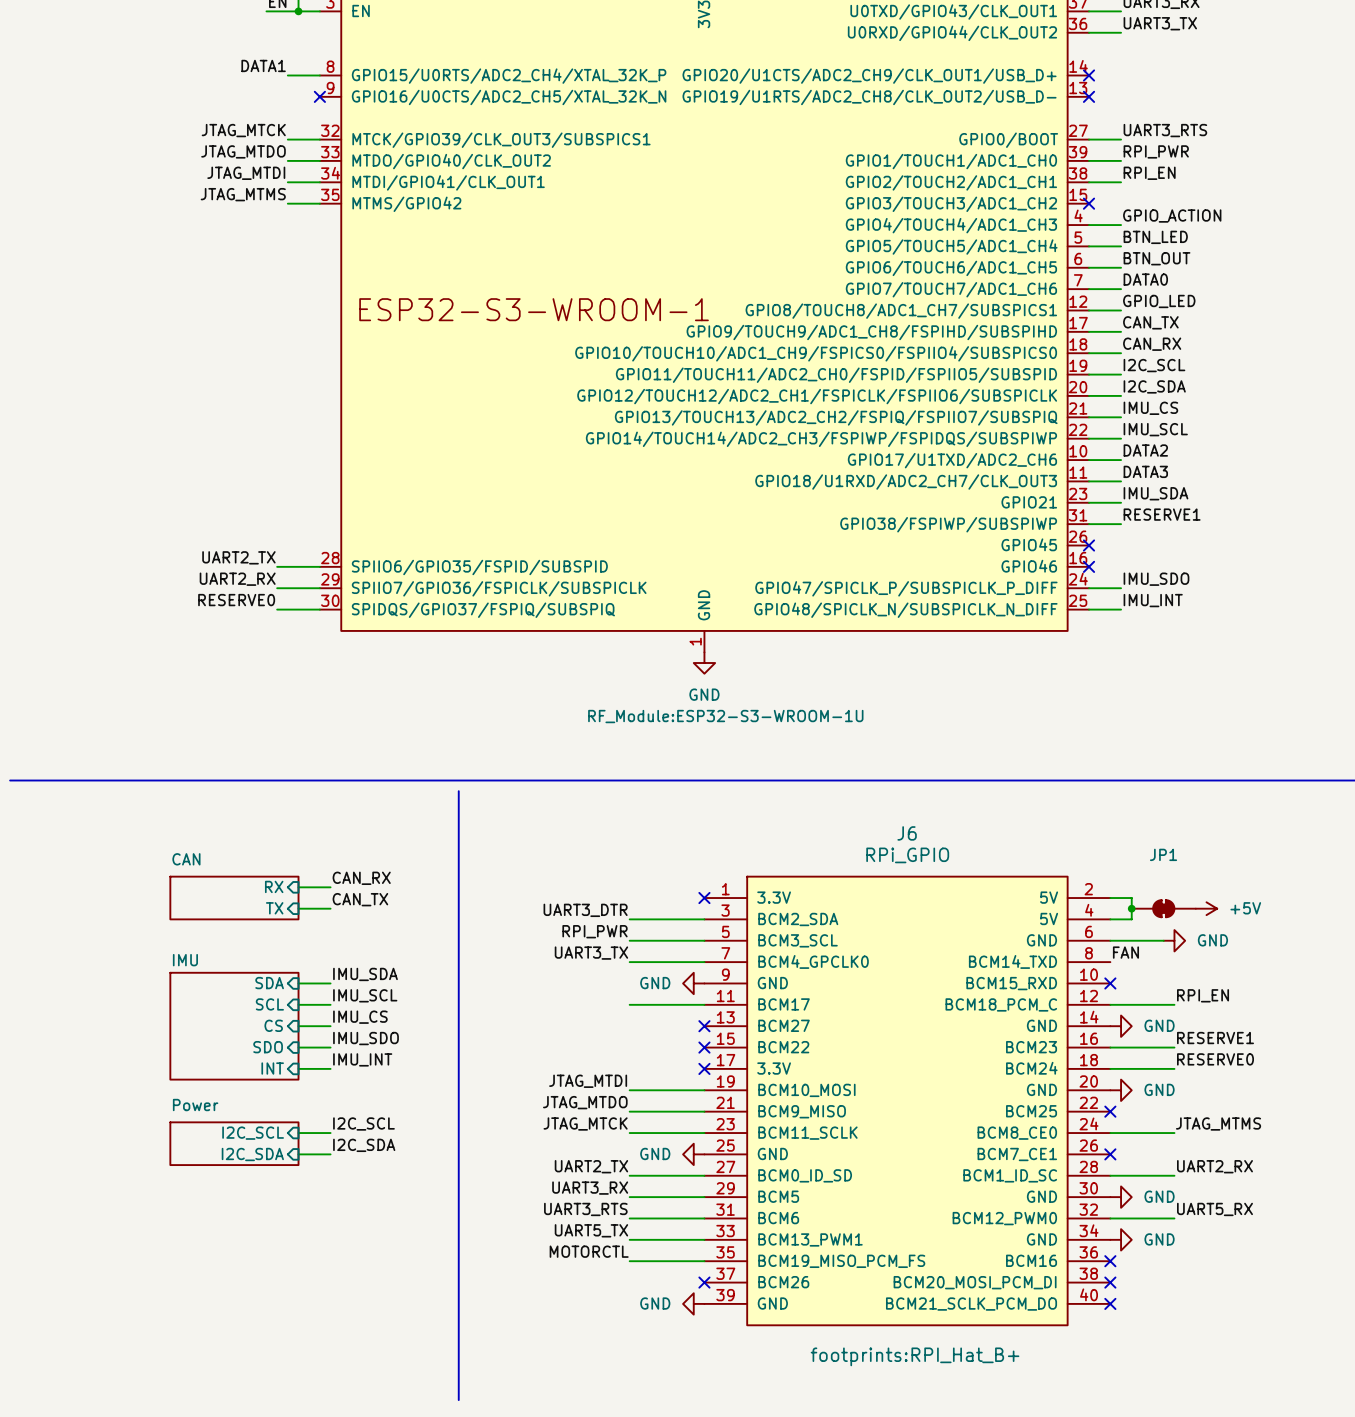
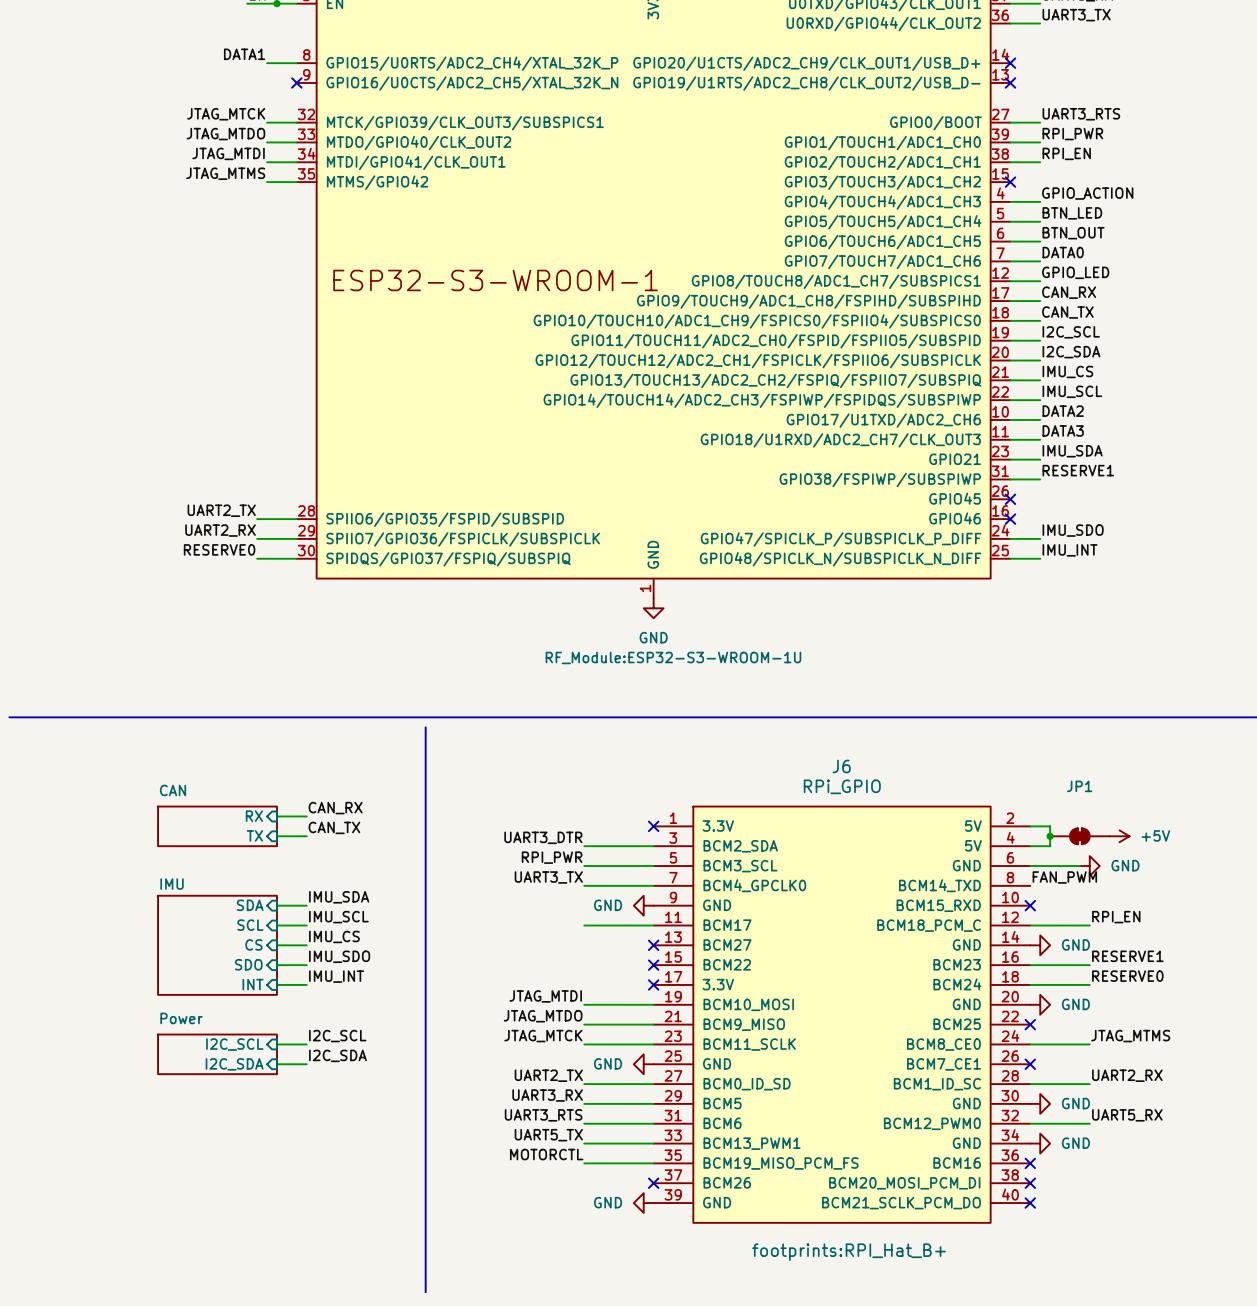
label: CAN_TX (1150, 322) -> CAN_RX (1069, 292)
label: CAN_RX (1152, 344) -> CAN_TX (1067, 312)
label: FAN (1125, 952) -> FAN_PWM (1064, 877)

